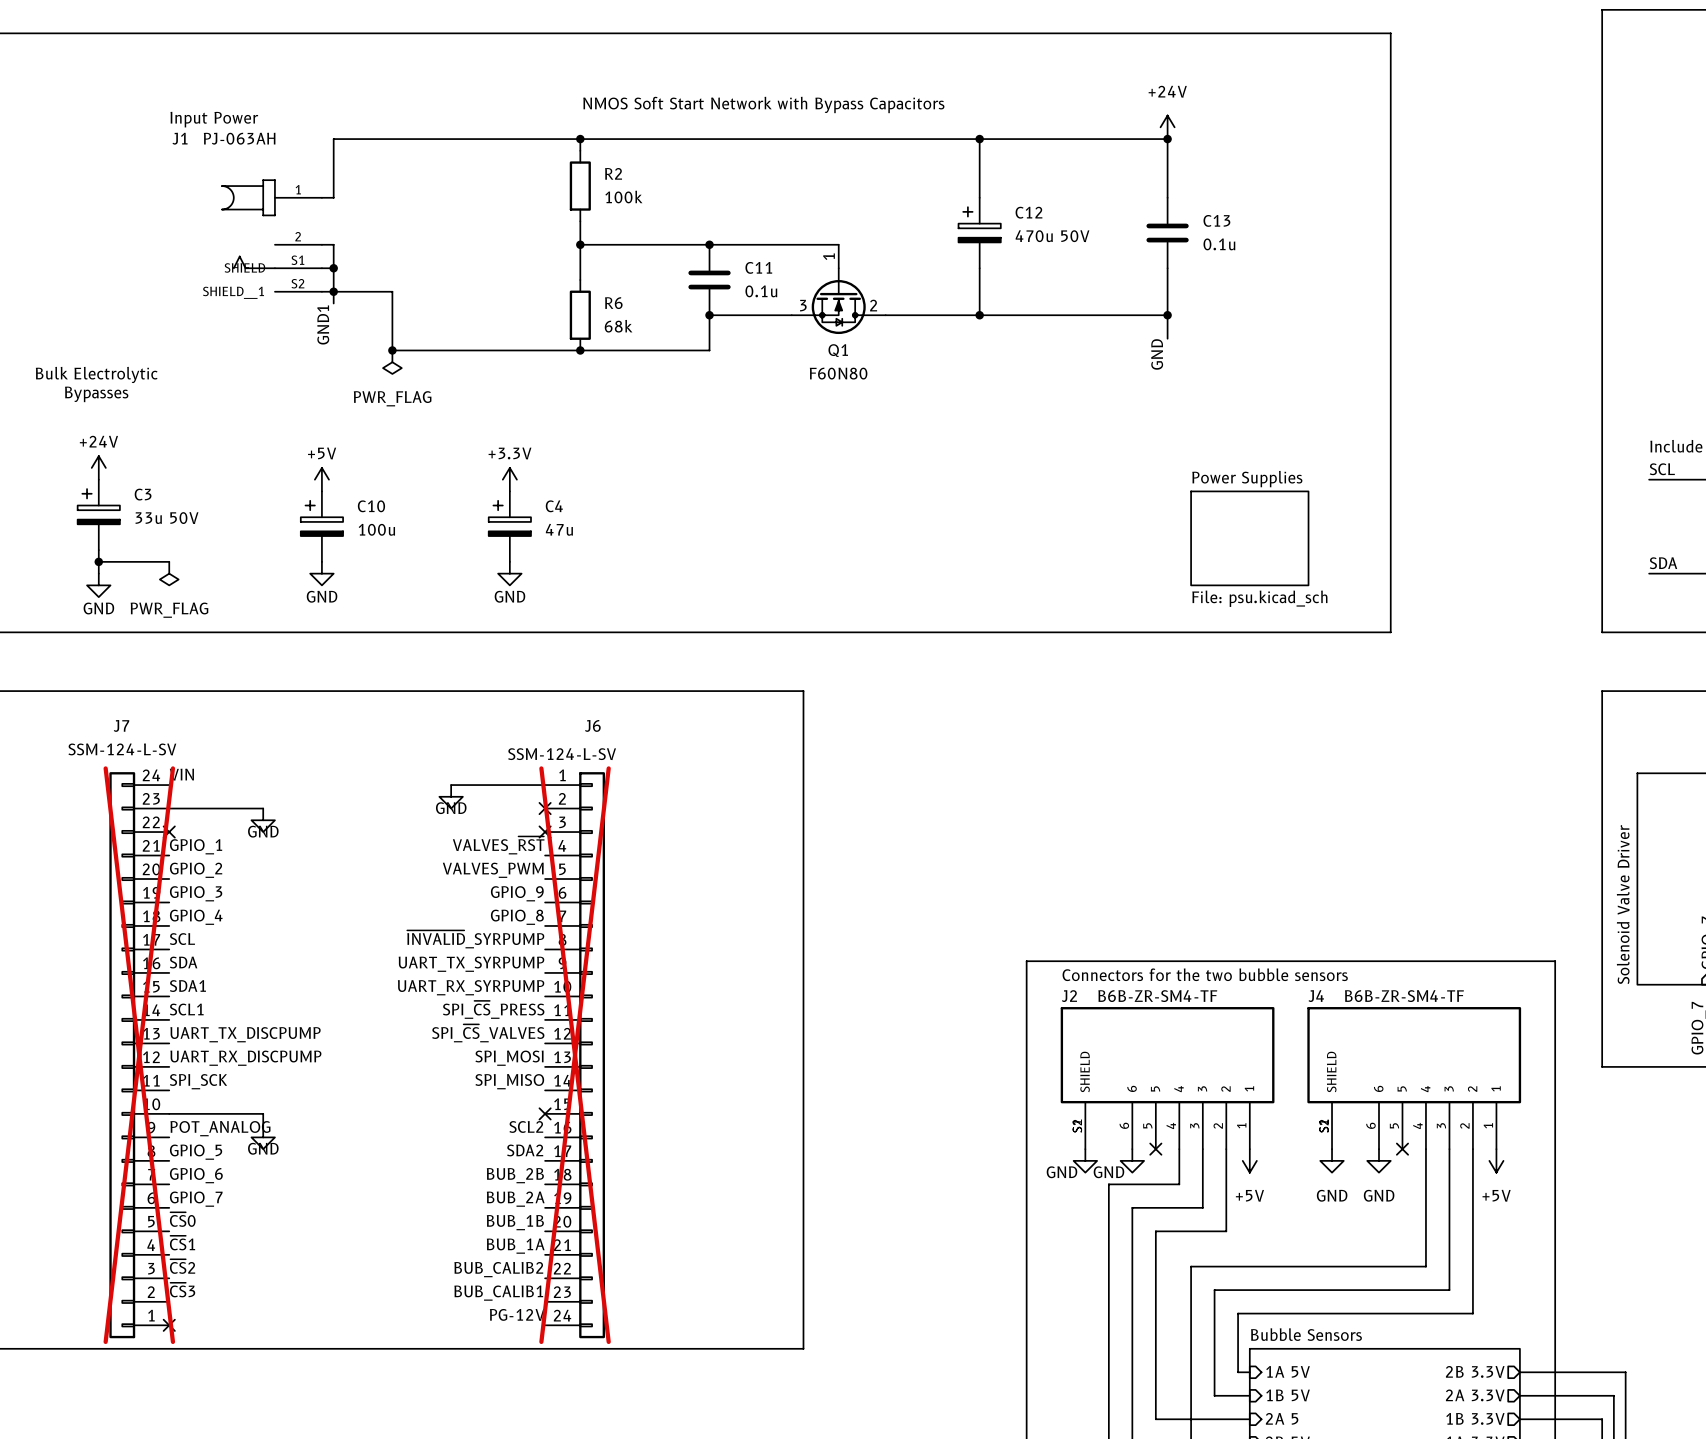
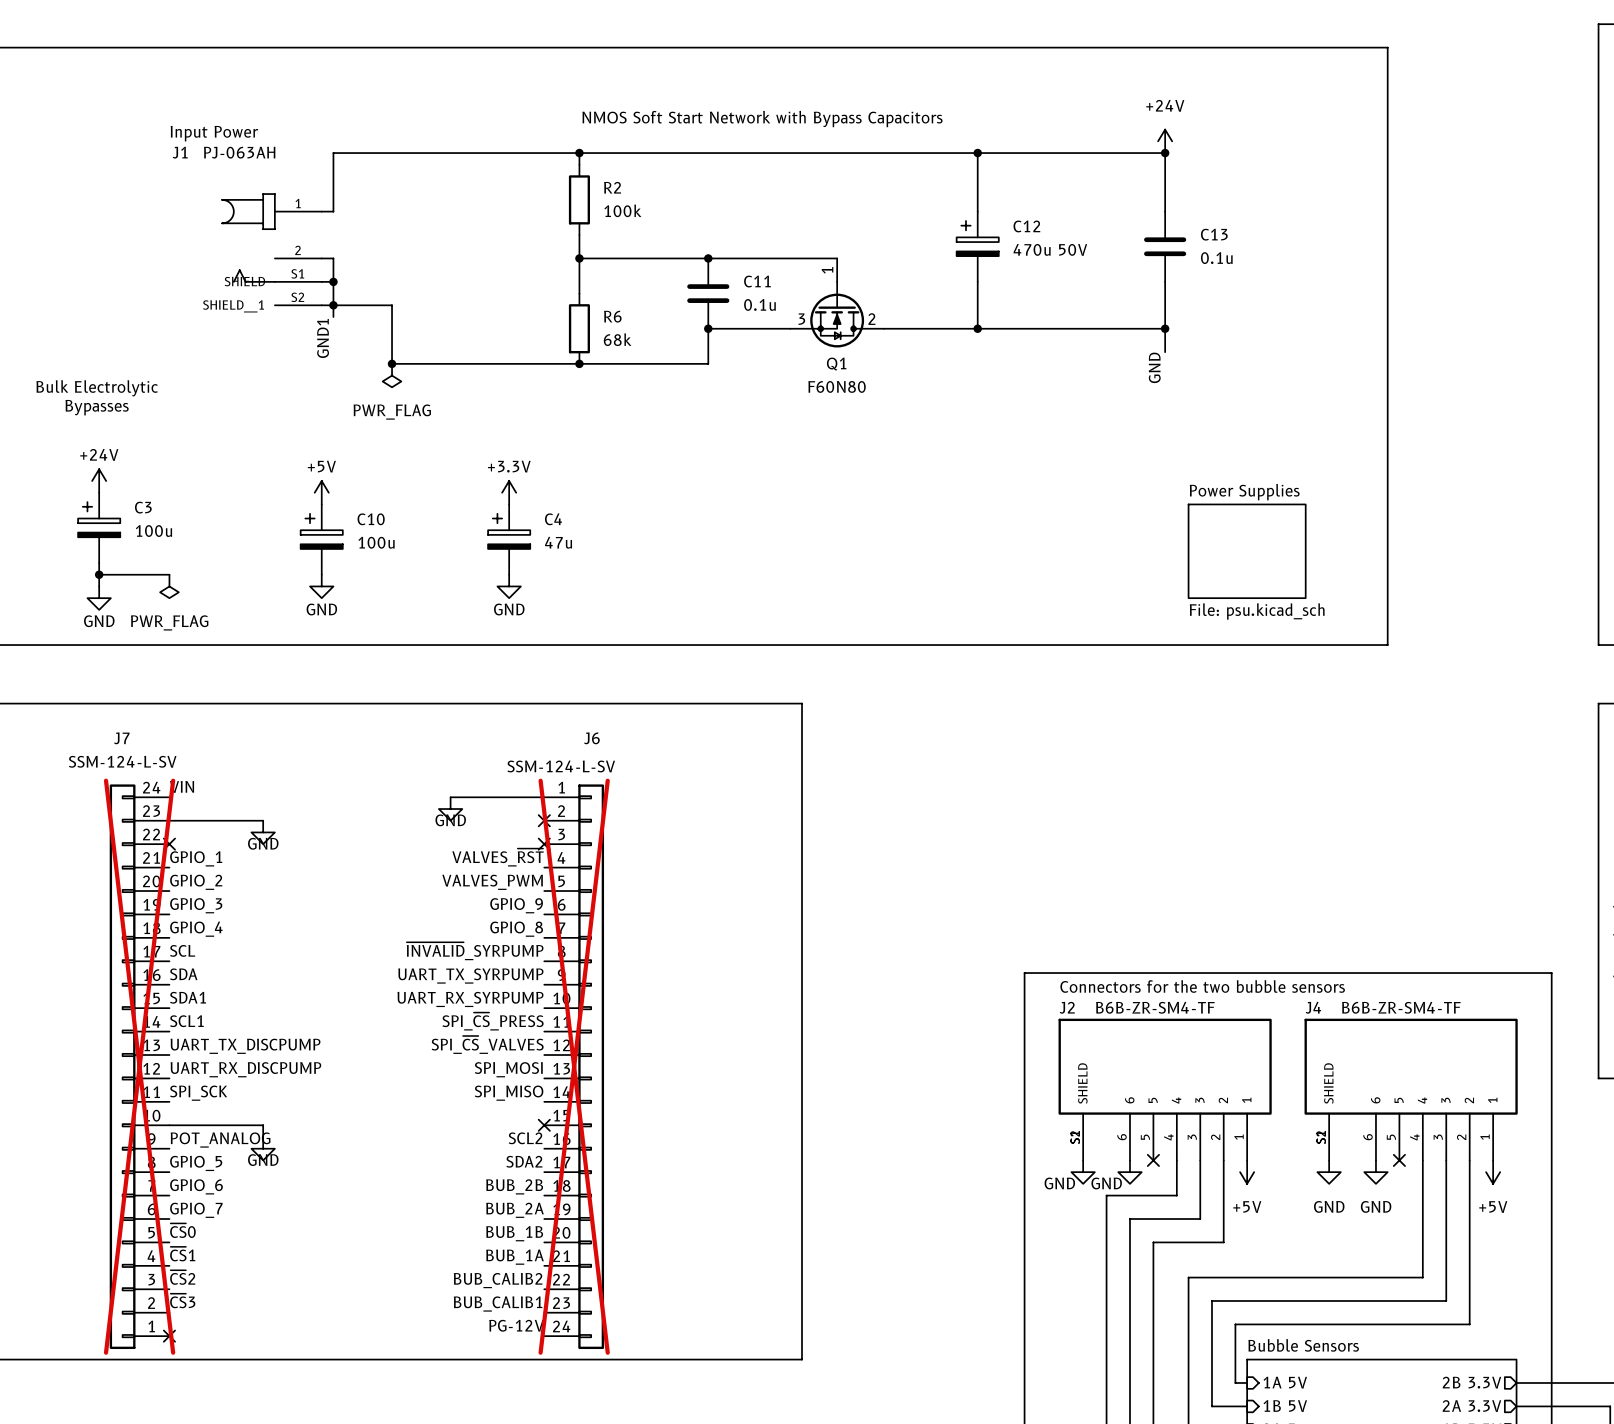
C3 value: 33u 50V (167, 518) -> 100u (153, 531)

